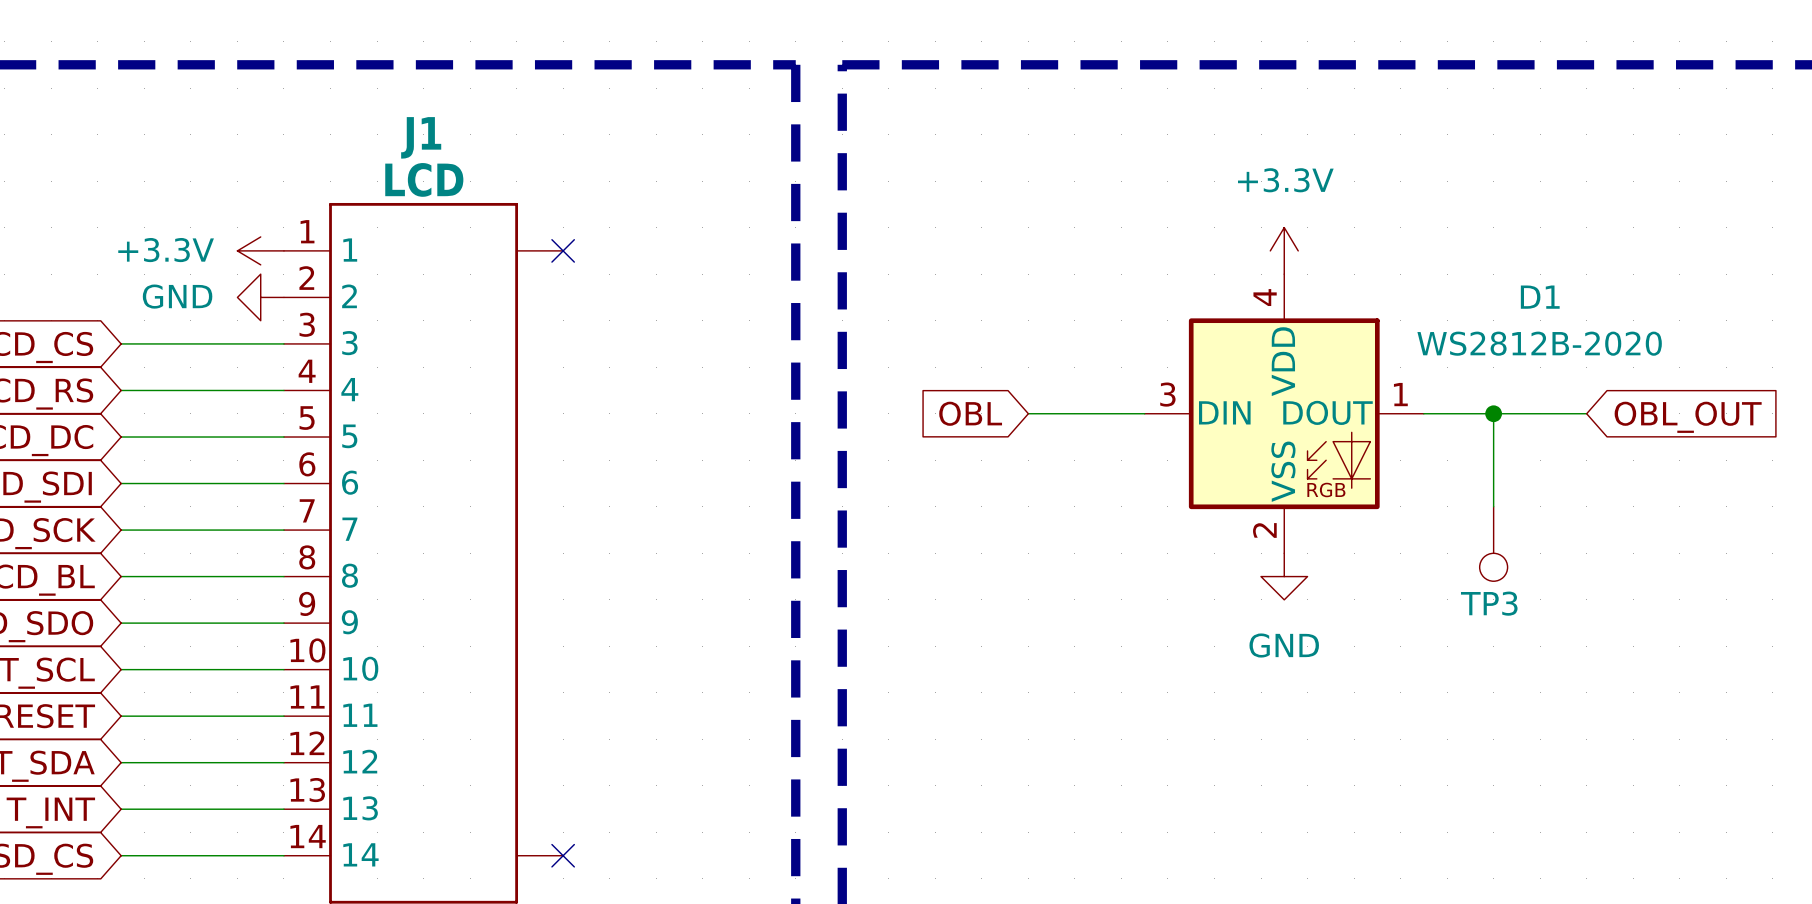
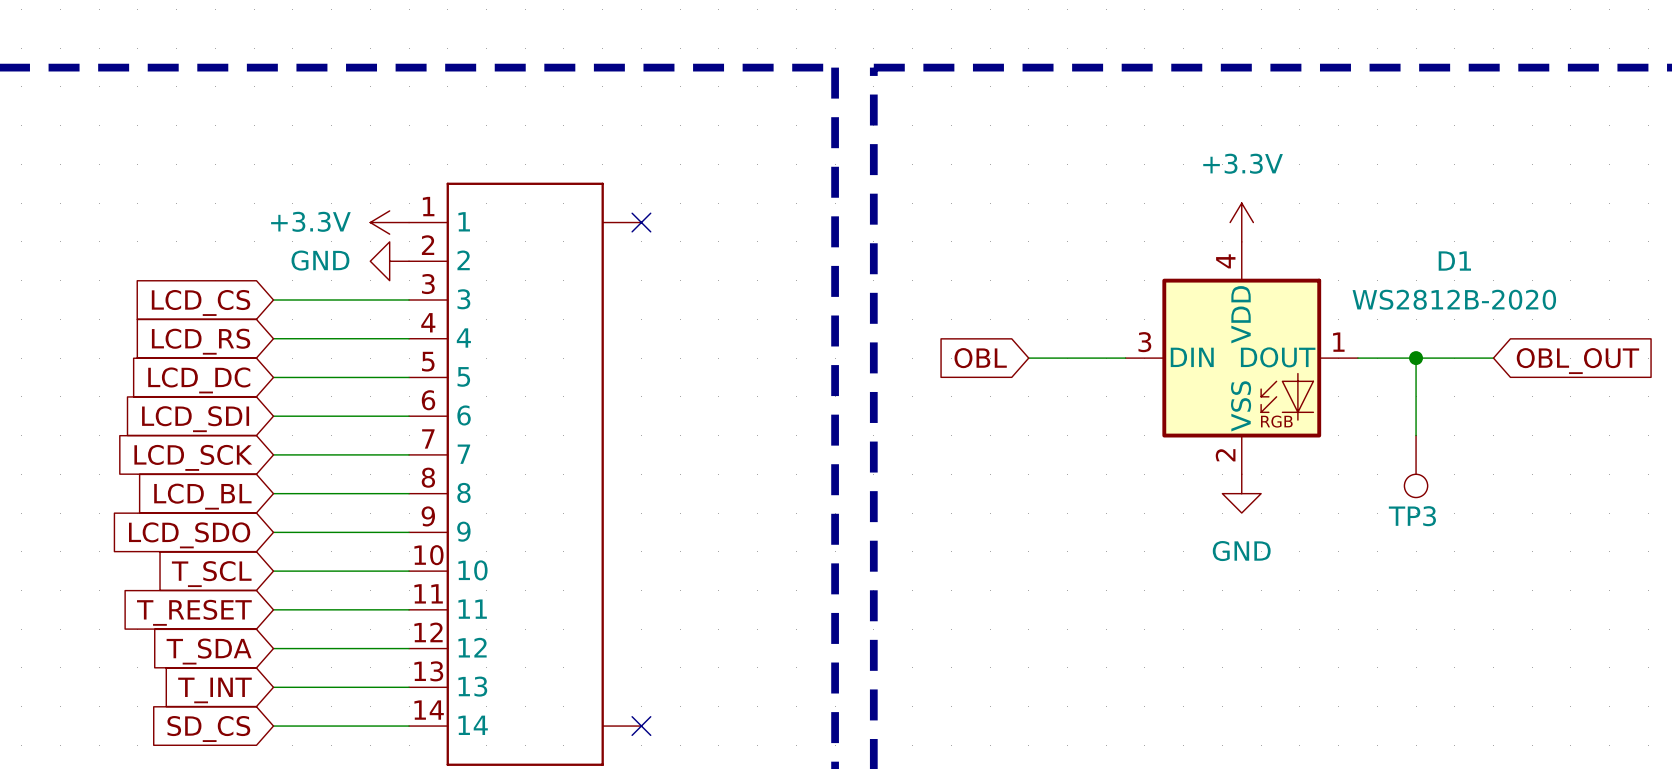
J1 name: J1 (421, 137) -> none
J1 value: LCD (424, 179) -> none

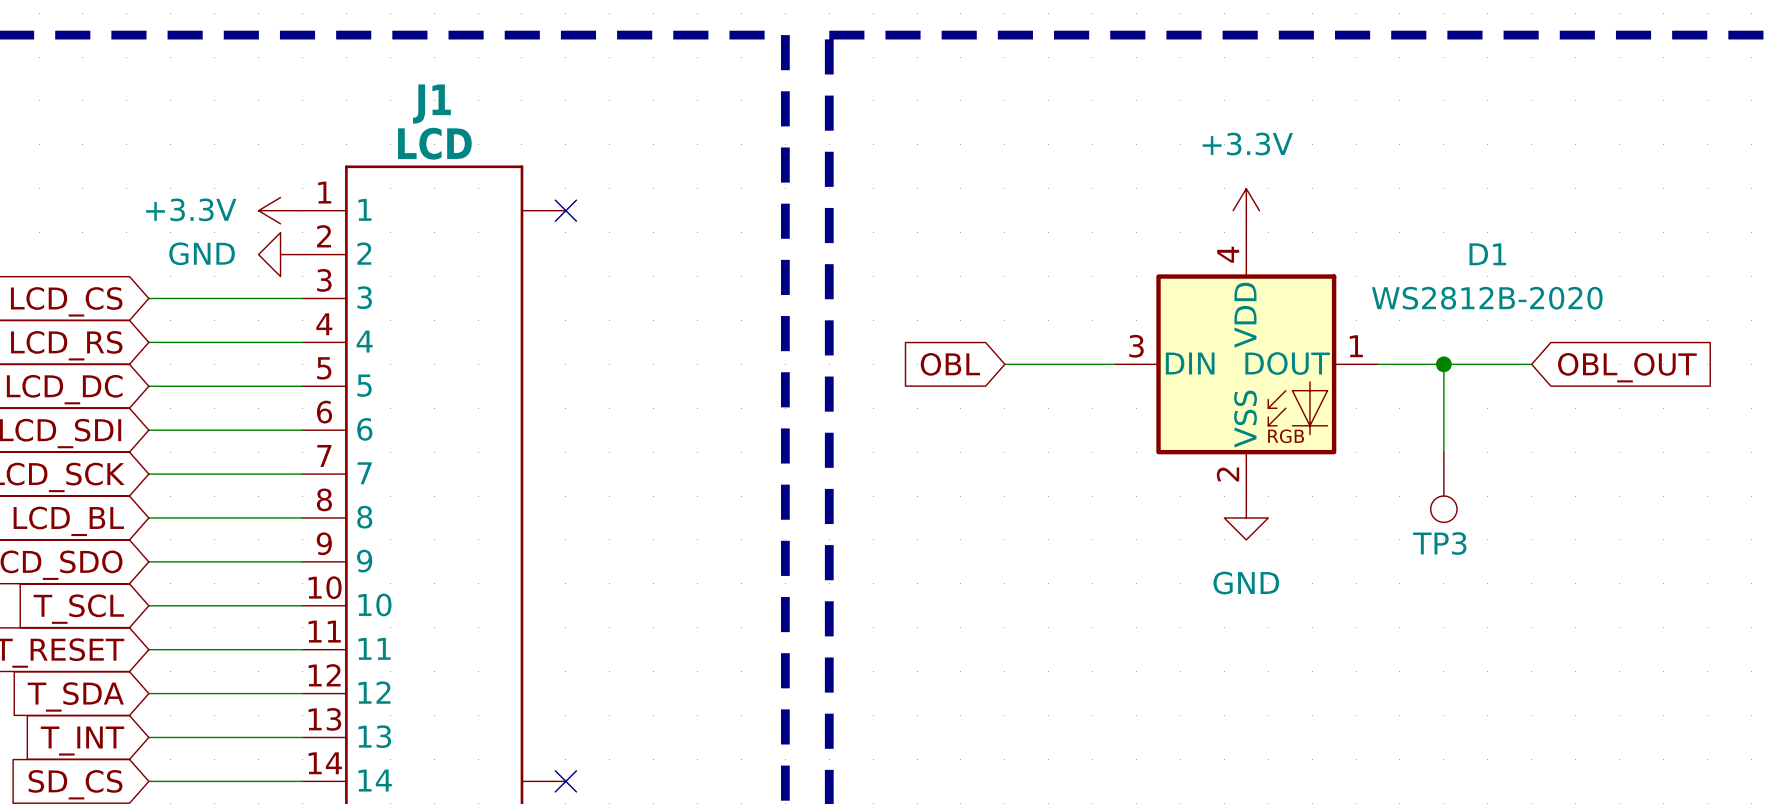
J1 name: none -> J1 (431, 104)
J1 value: none -> LCD (434, 143)

